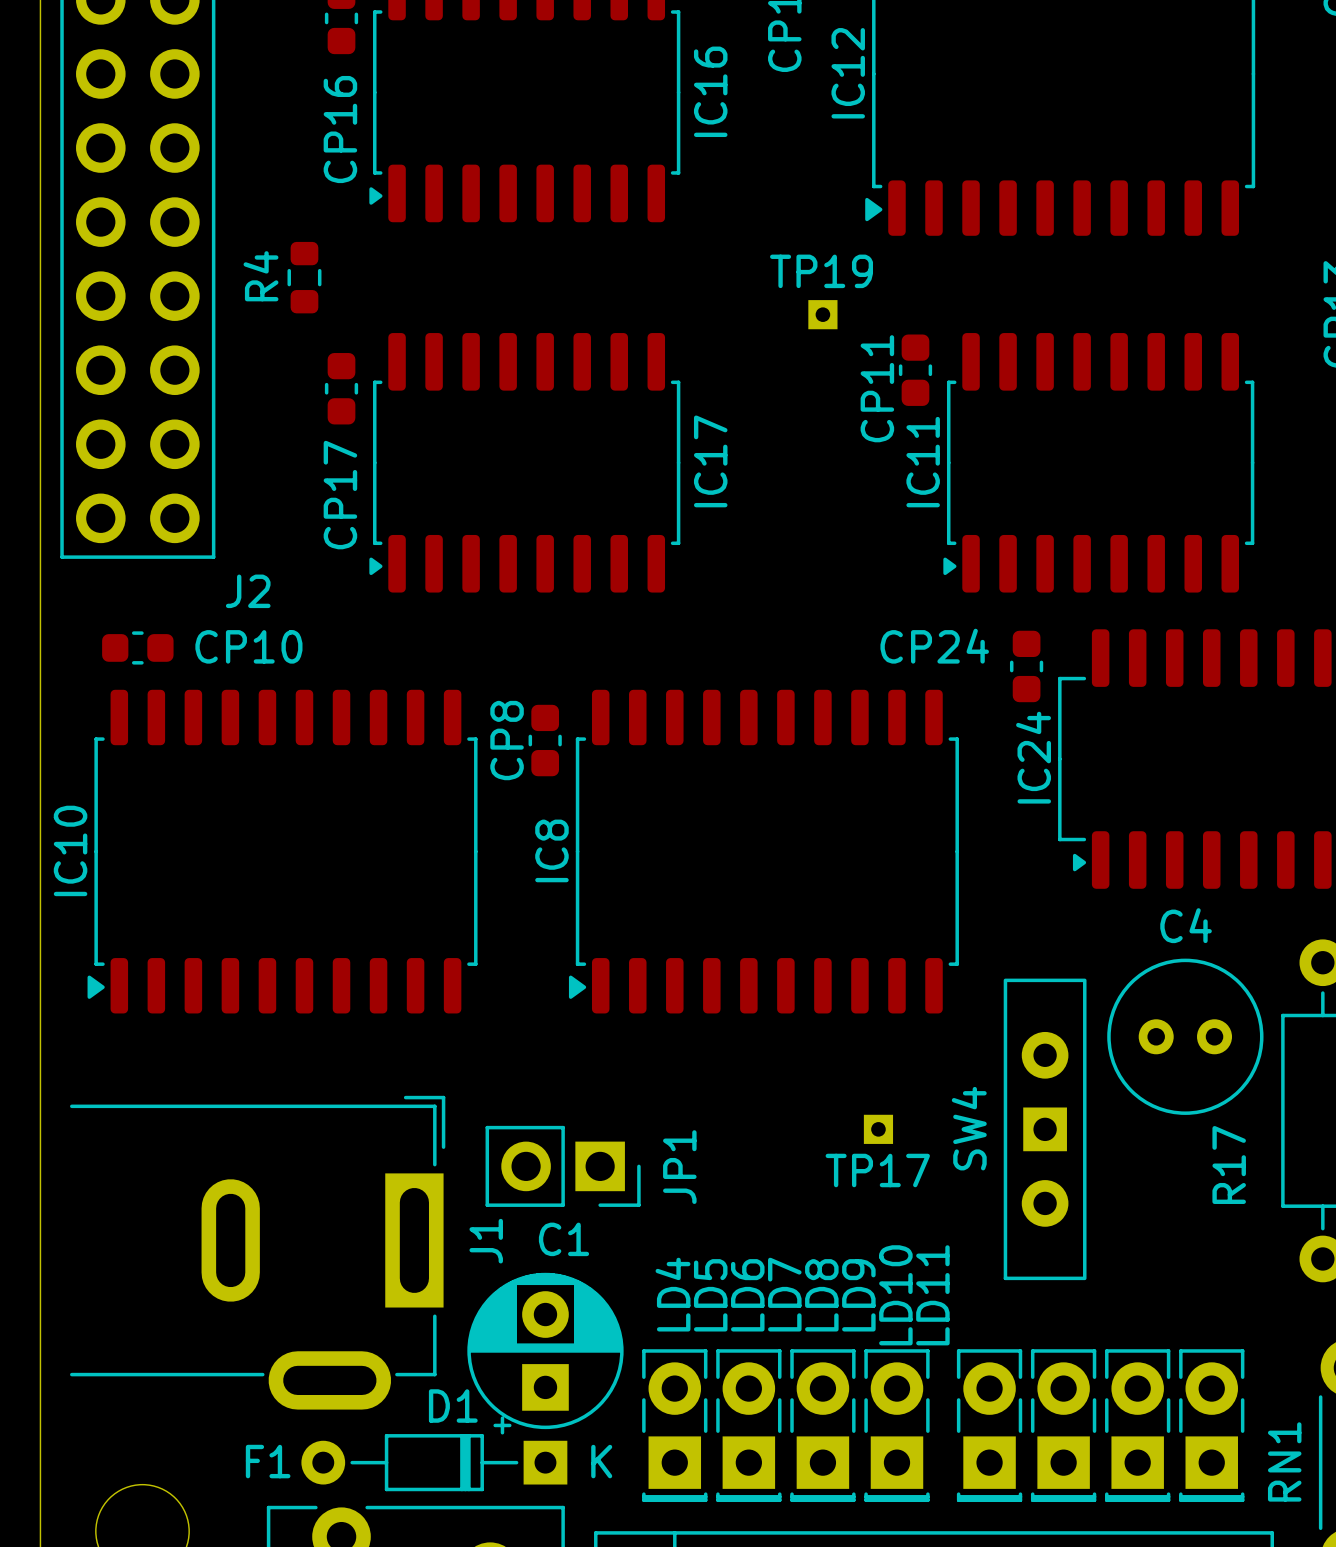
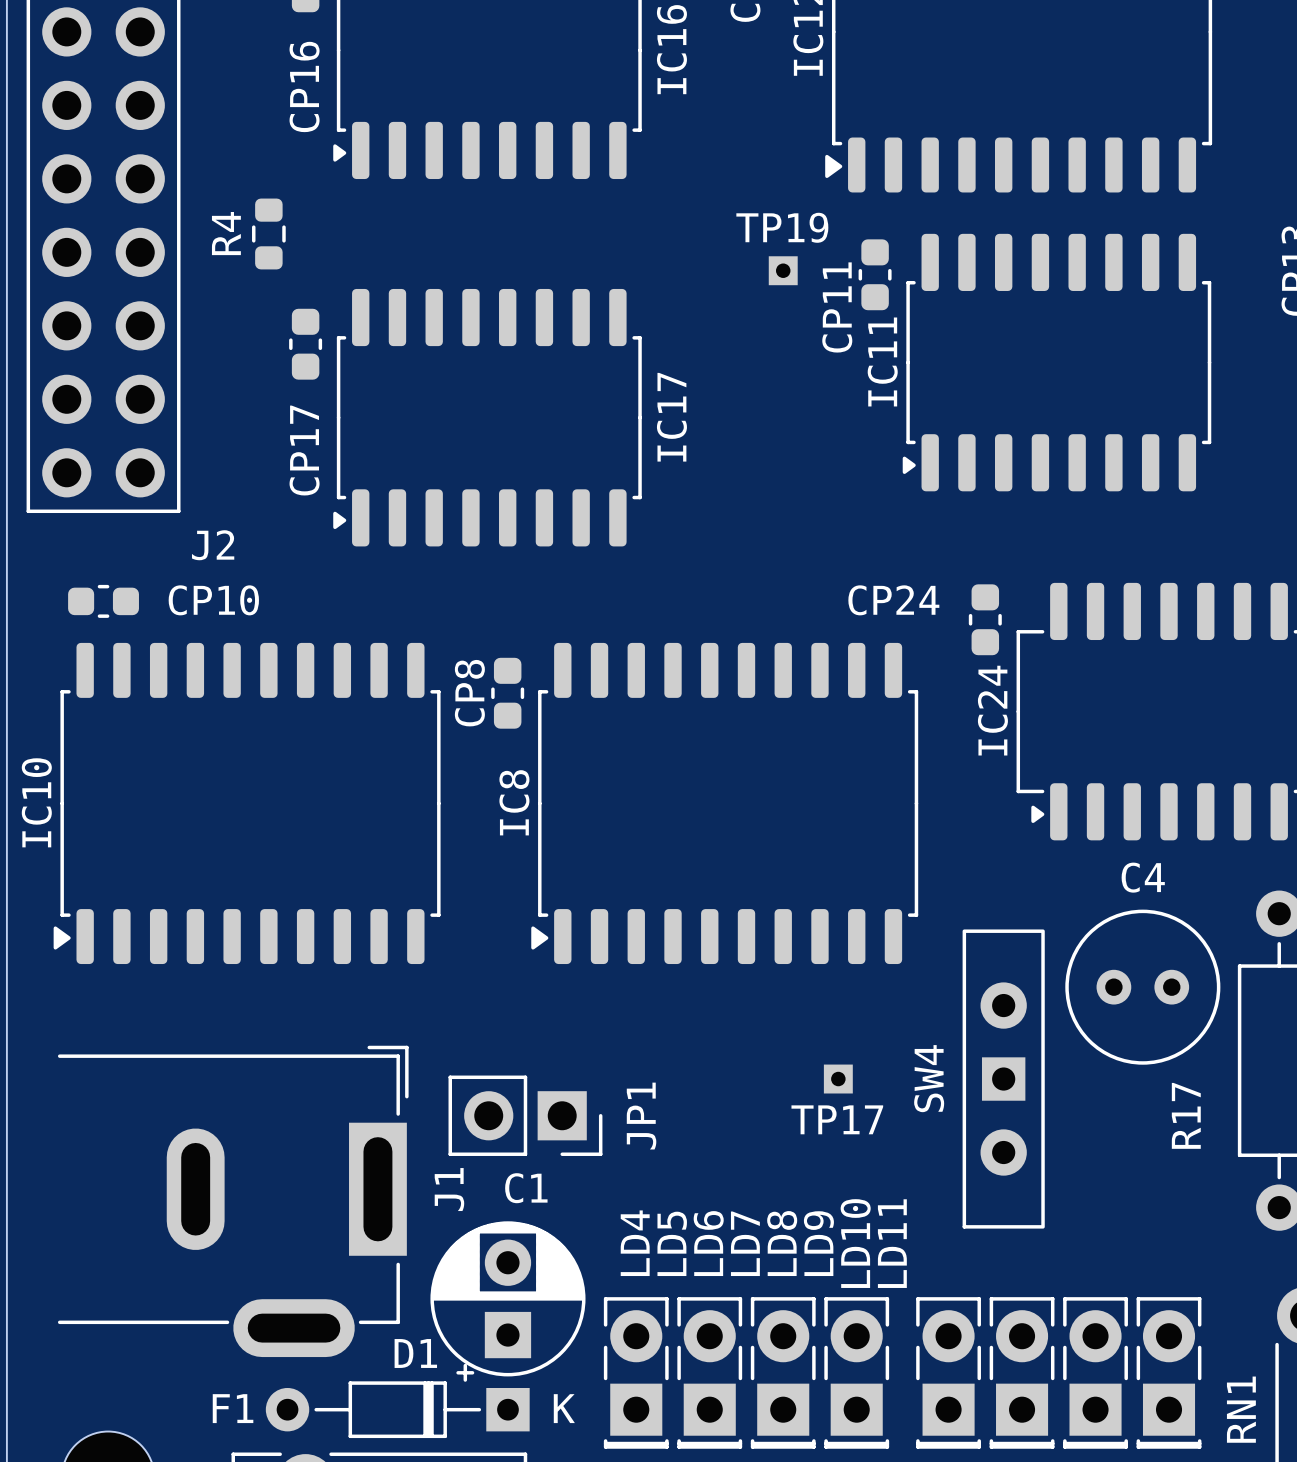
CP11 position: (915, 370) -> (875, 274)
CP11 name position: CP11 (877, 388) -> CP11 (837, 307)
IC11 position: (1098, 462) -> (1056, 362)
J1 footprint: [70, 1095, 446, 1410] -> [57, 1045, 409, 1358]

